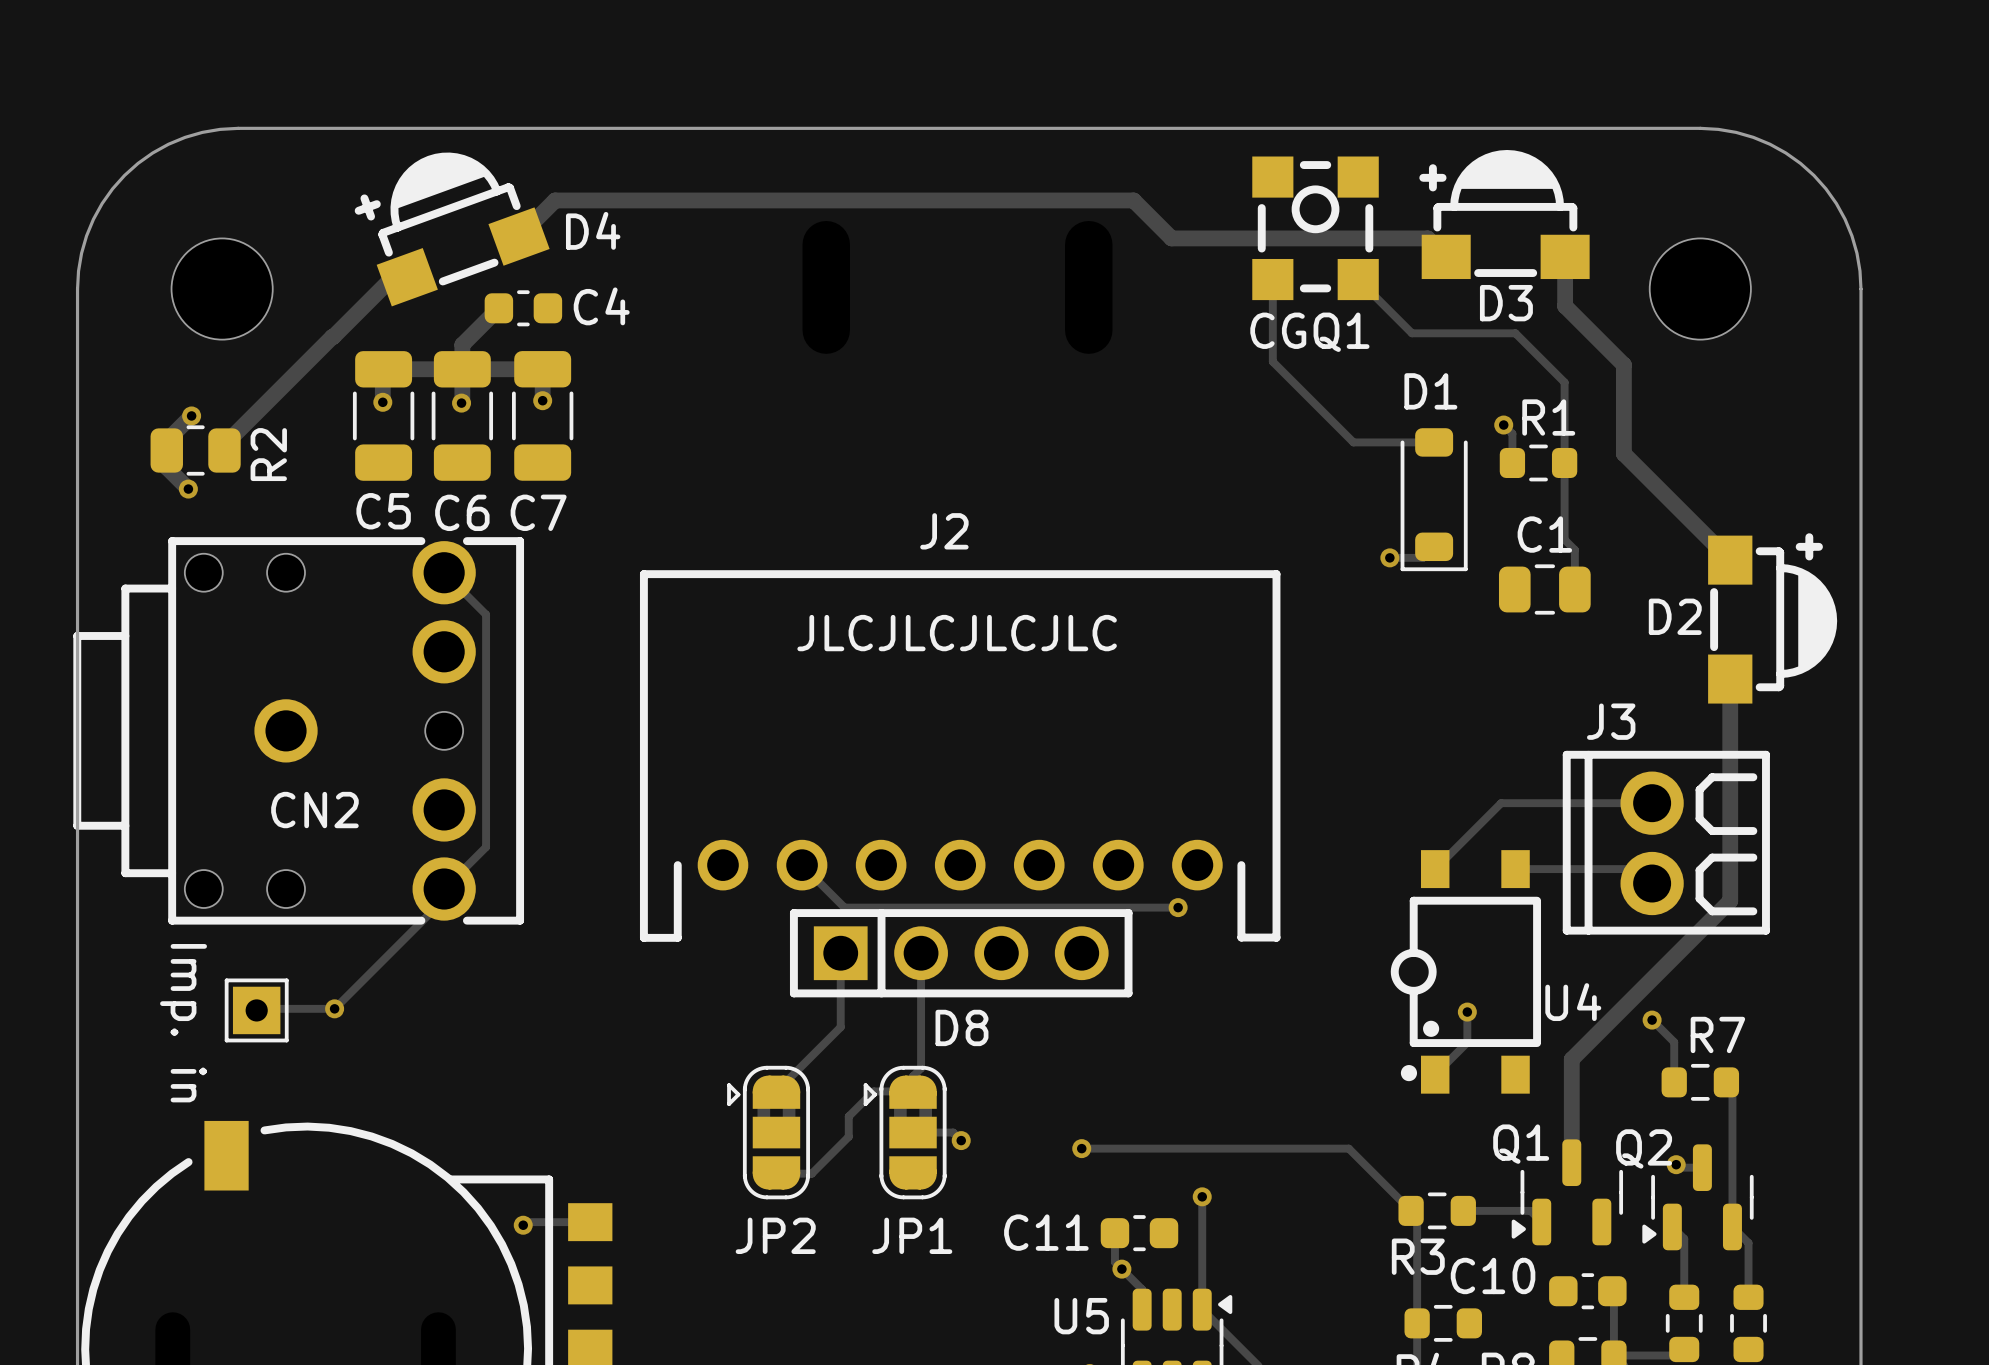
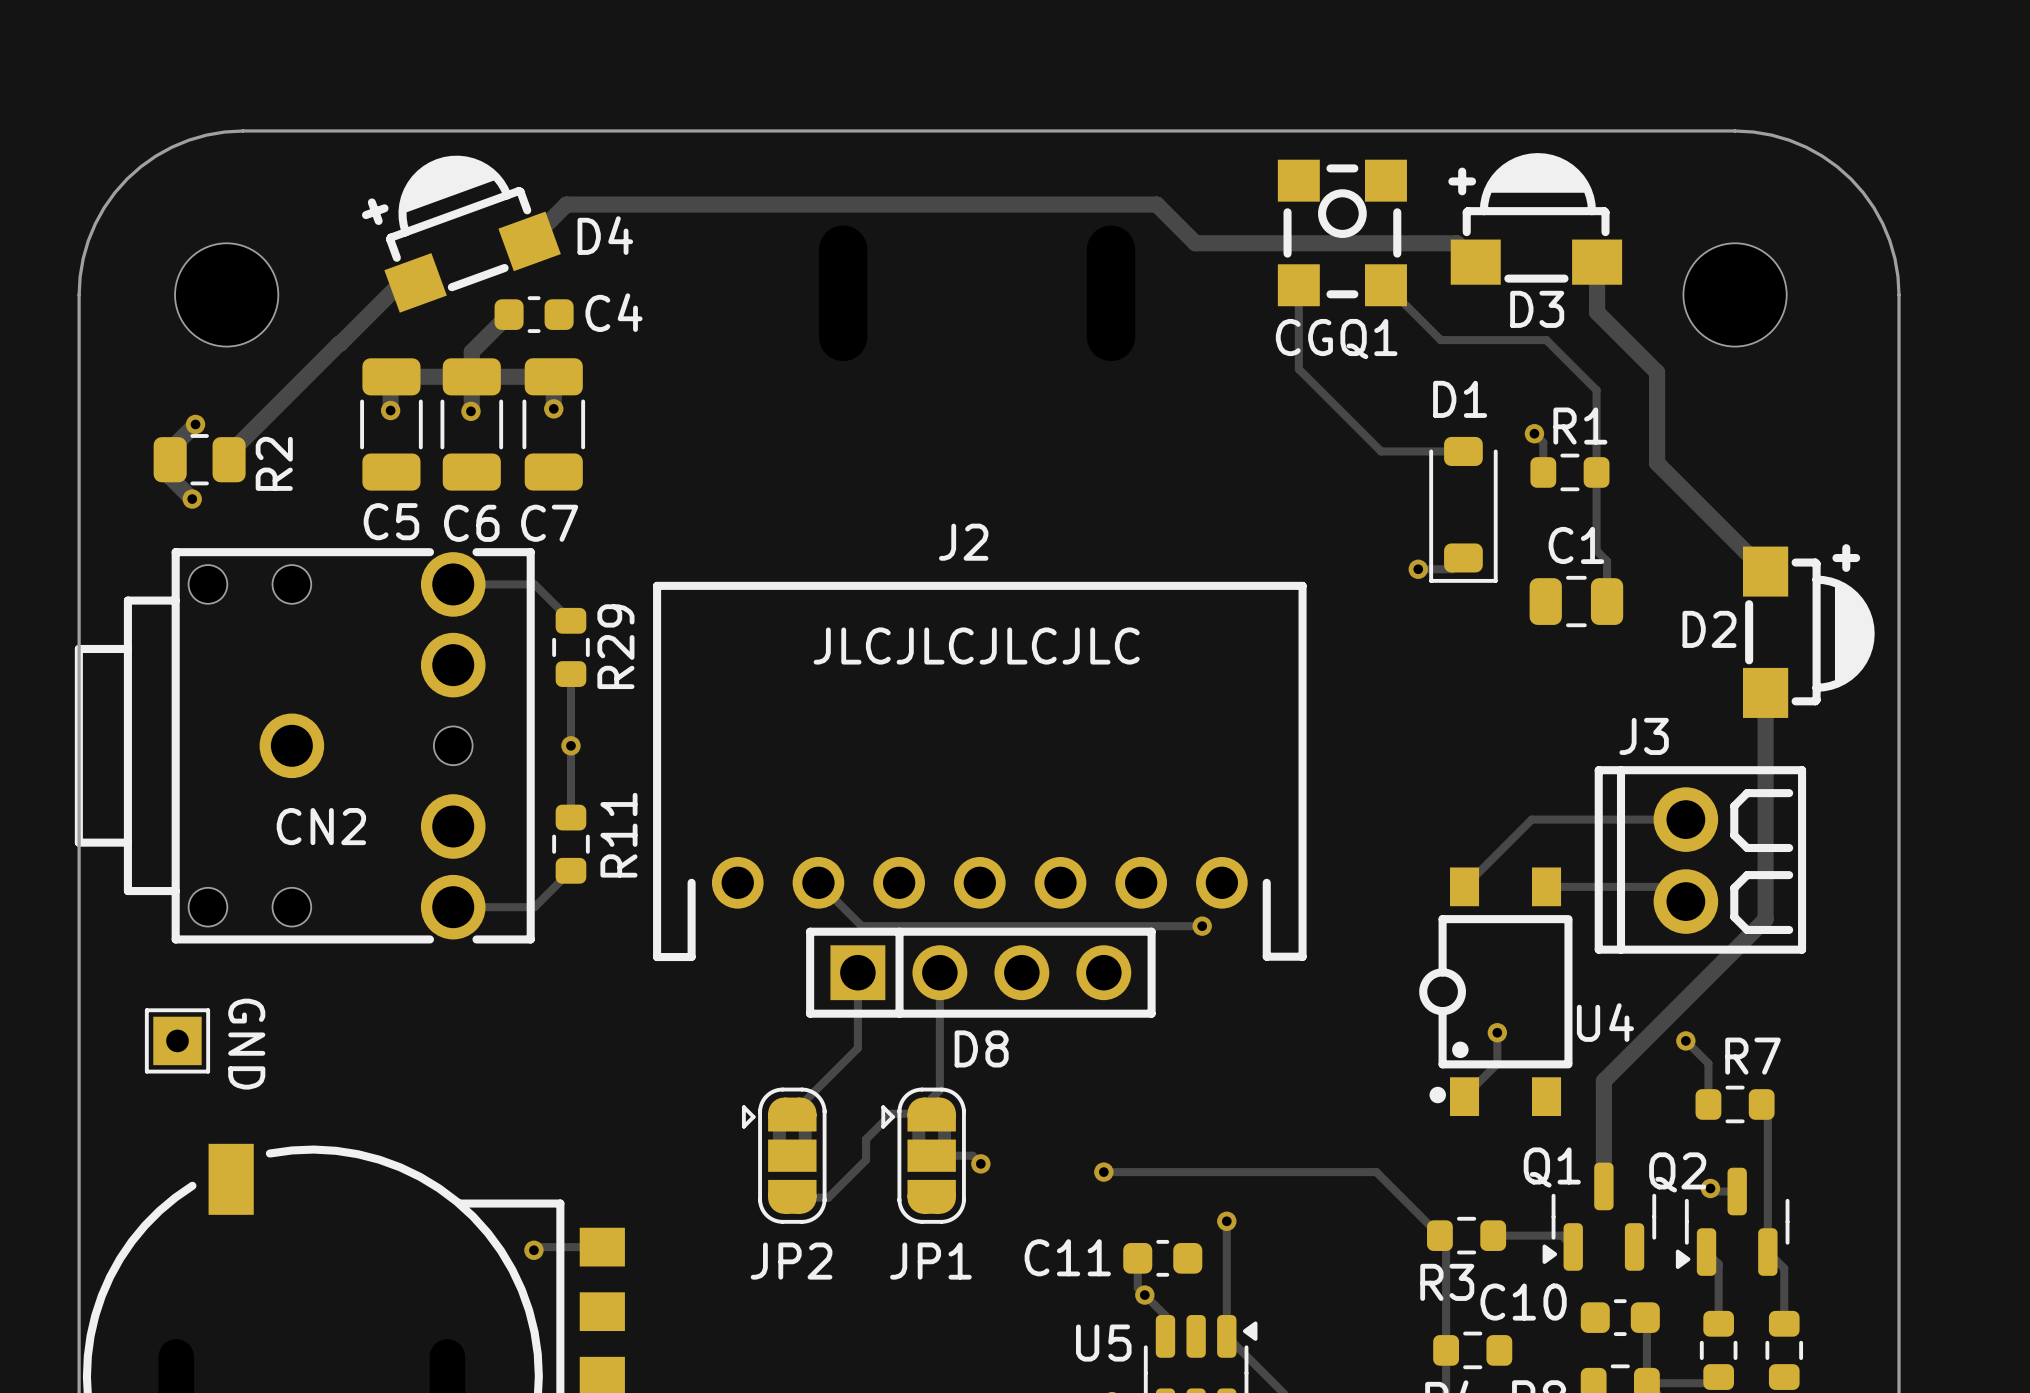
track: (444, 572) (486, 614) (486, 847) (444, 889) (444, 899) (334, 1008) (256, 1010) -> (453, 584) (534, 584) (570, 620)
R29: none -> (570, 647)
track: none -> (570, 674) (570, 817)
via: none -> (570, 745)
R11: none -> (570, 844)
track: none -> (570, 870) (534, 907) (453, 907)
via: (334, 1008) -> none
part position: (256, 1010) -> (177, 1040)
text: Imp. in (183, 1023) -> none
text: none -> GND (246, 1044)

